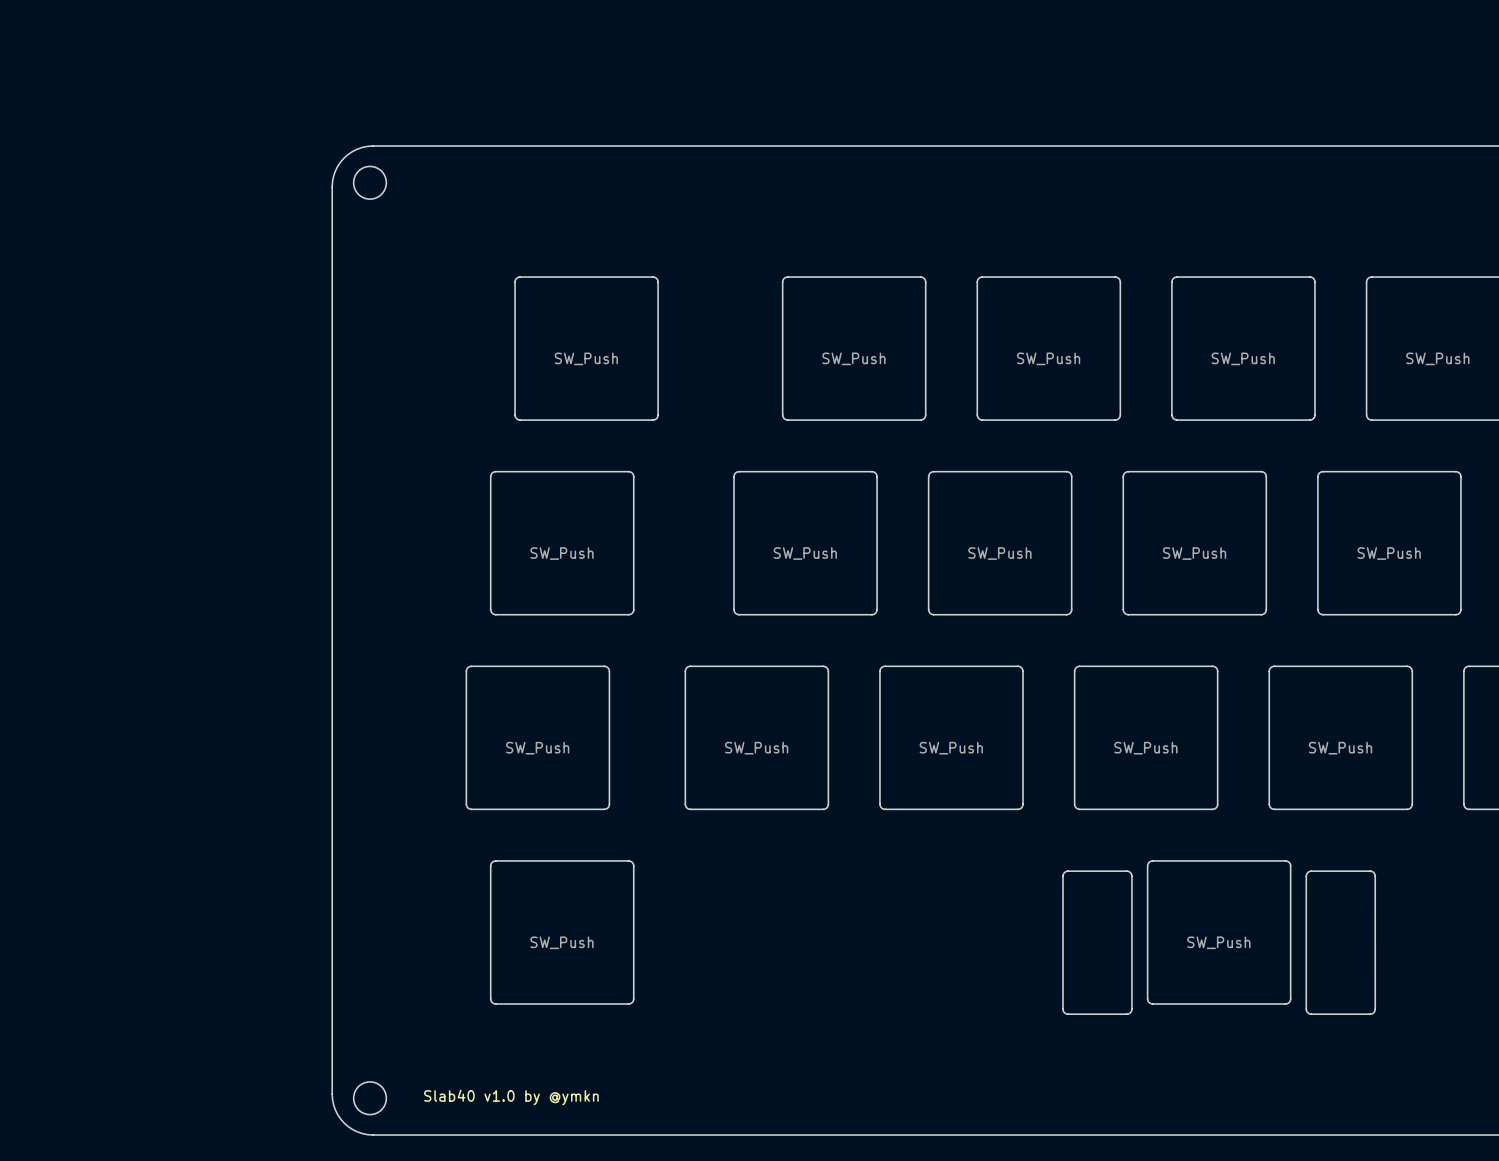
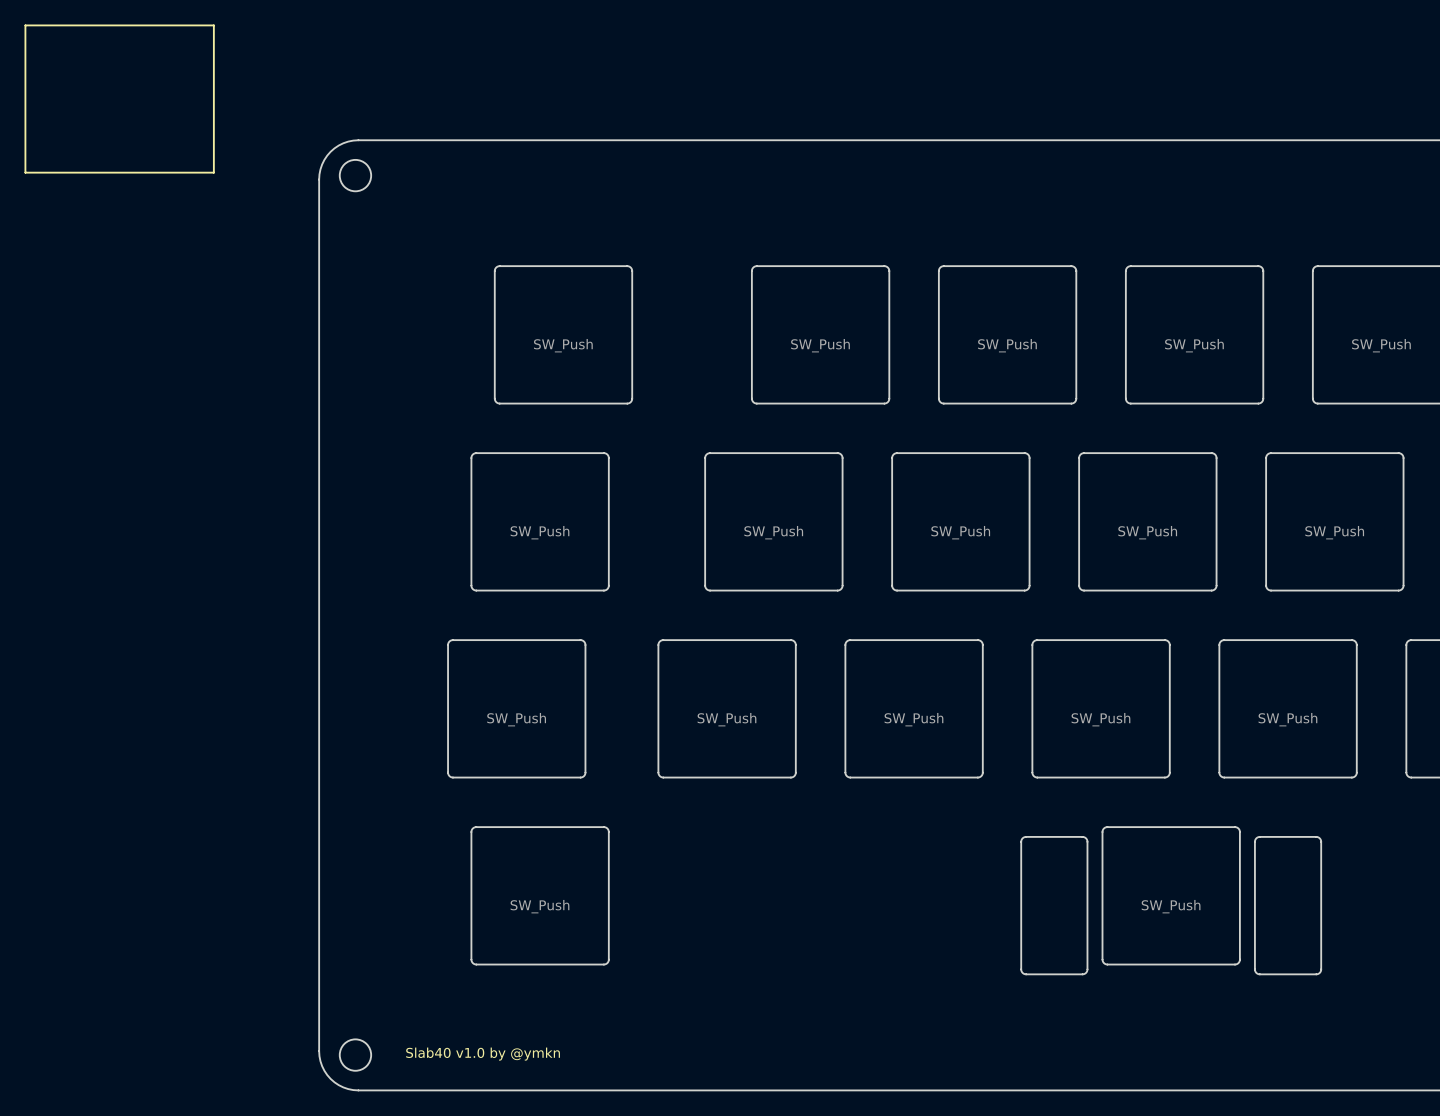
line: none -> (213, 25) (25, 25) (25, 172) (213, 172) (213, 25)

